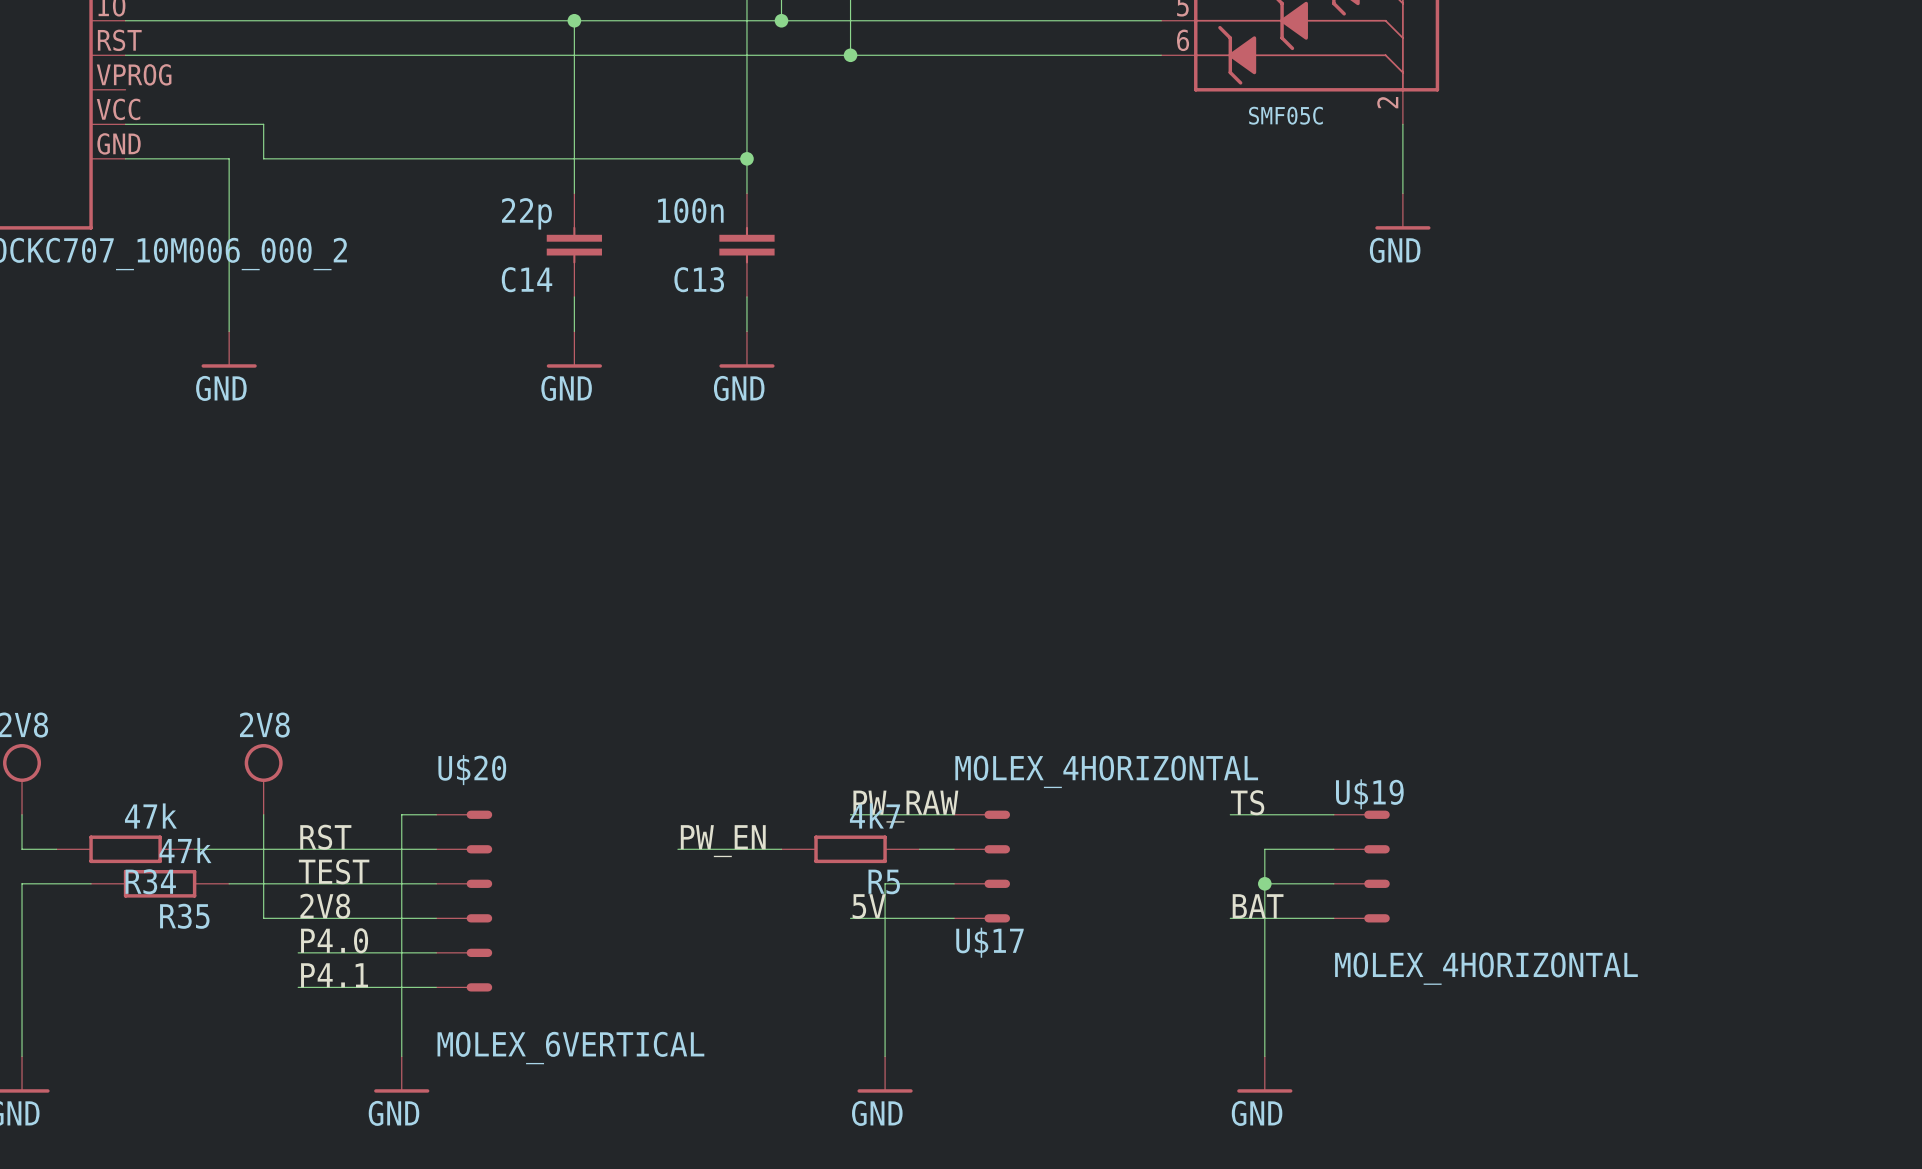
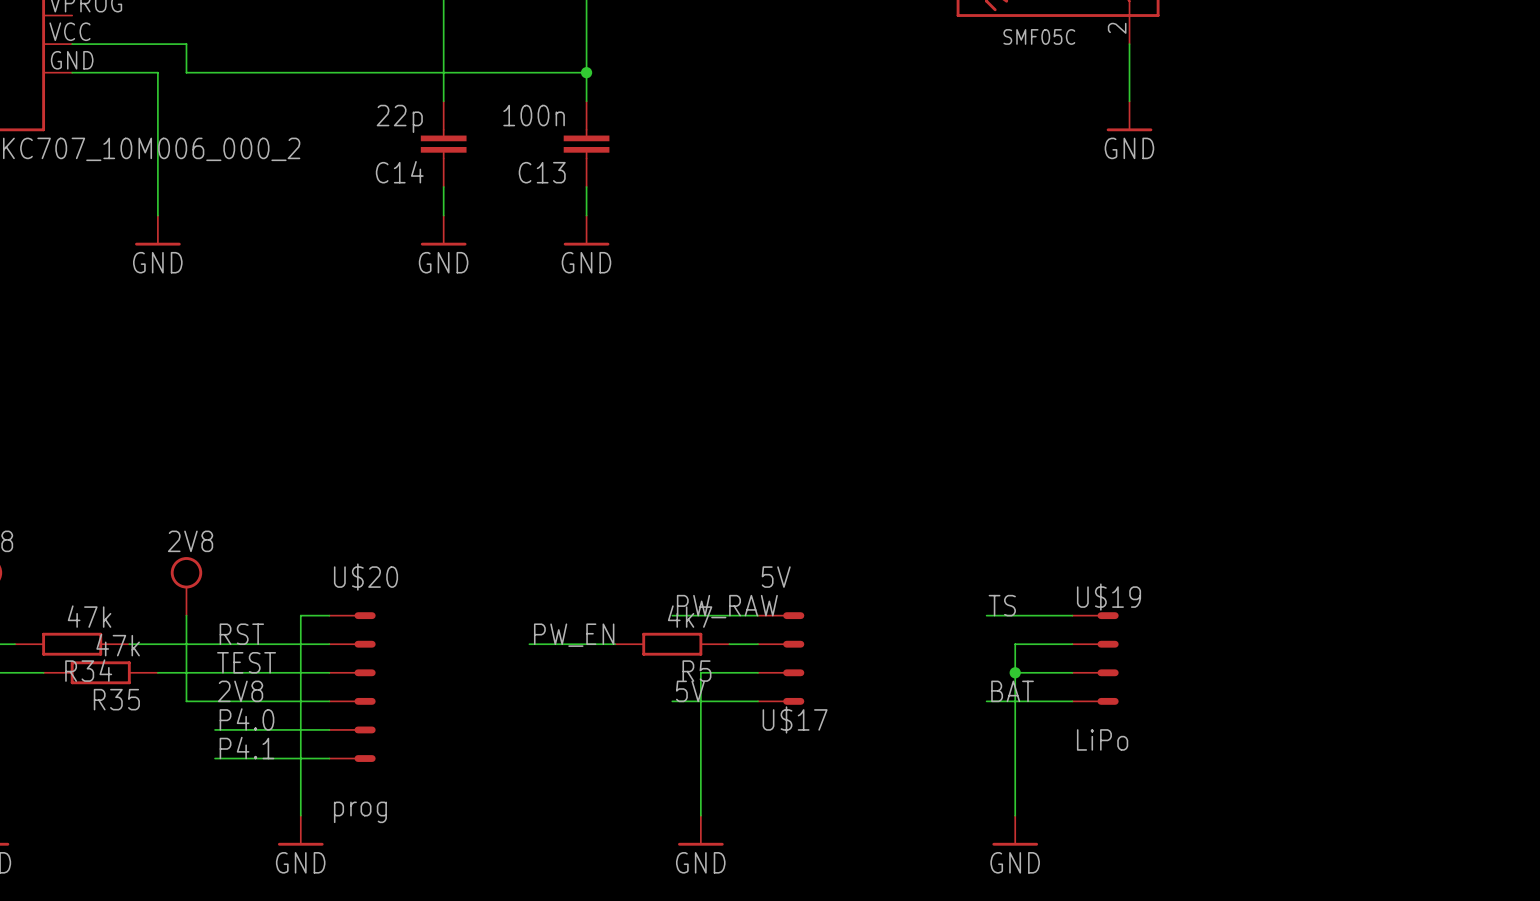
U$17 value: MOLEX_4HORIZONTAL (1106, 771) -> 5V (776, 577)
U$19 value: MOLEX_4HORIZONTAL (1486, 968) -> LiPo (1102, 739)
U$20 value: MOLEX_6VERTICAL (570, 1048) -> prog (360, 812)

